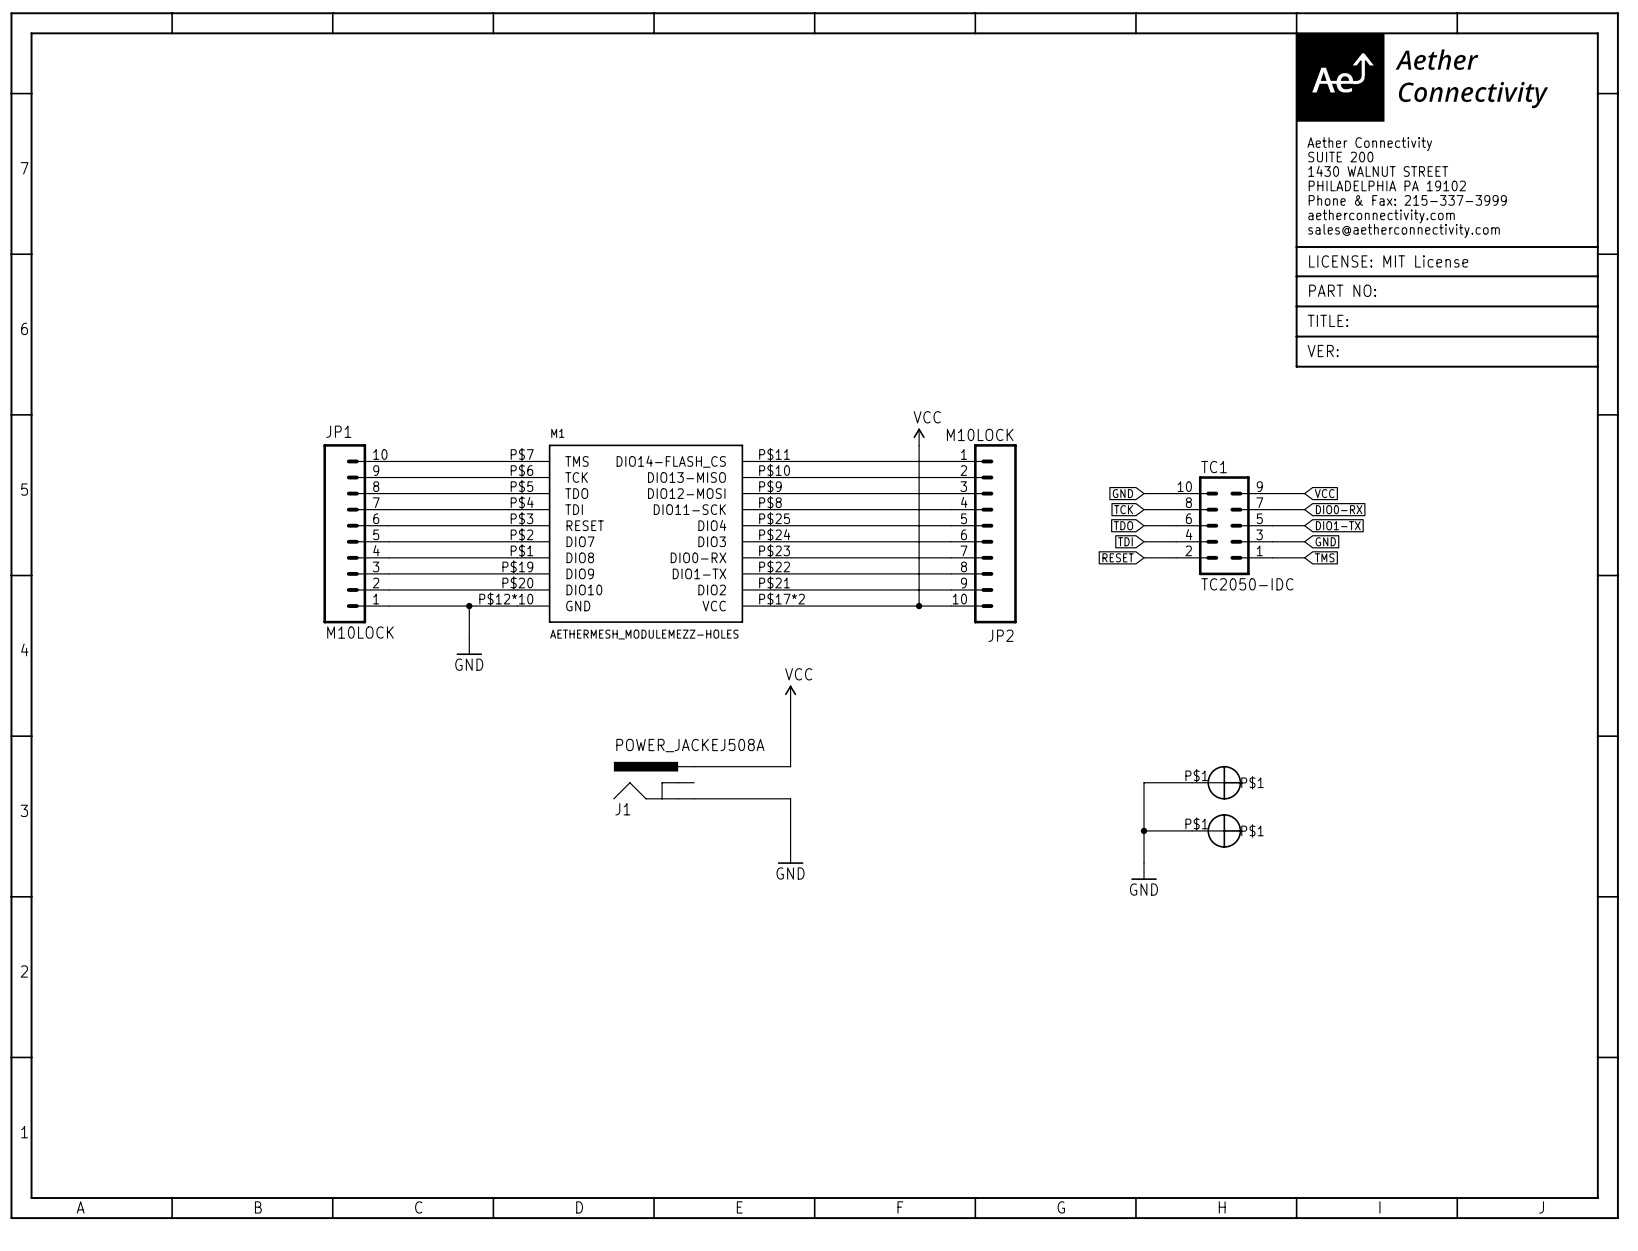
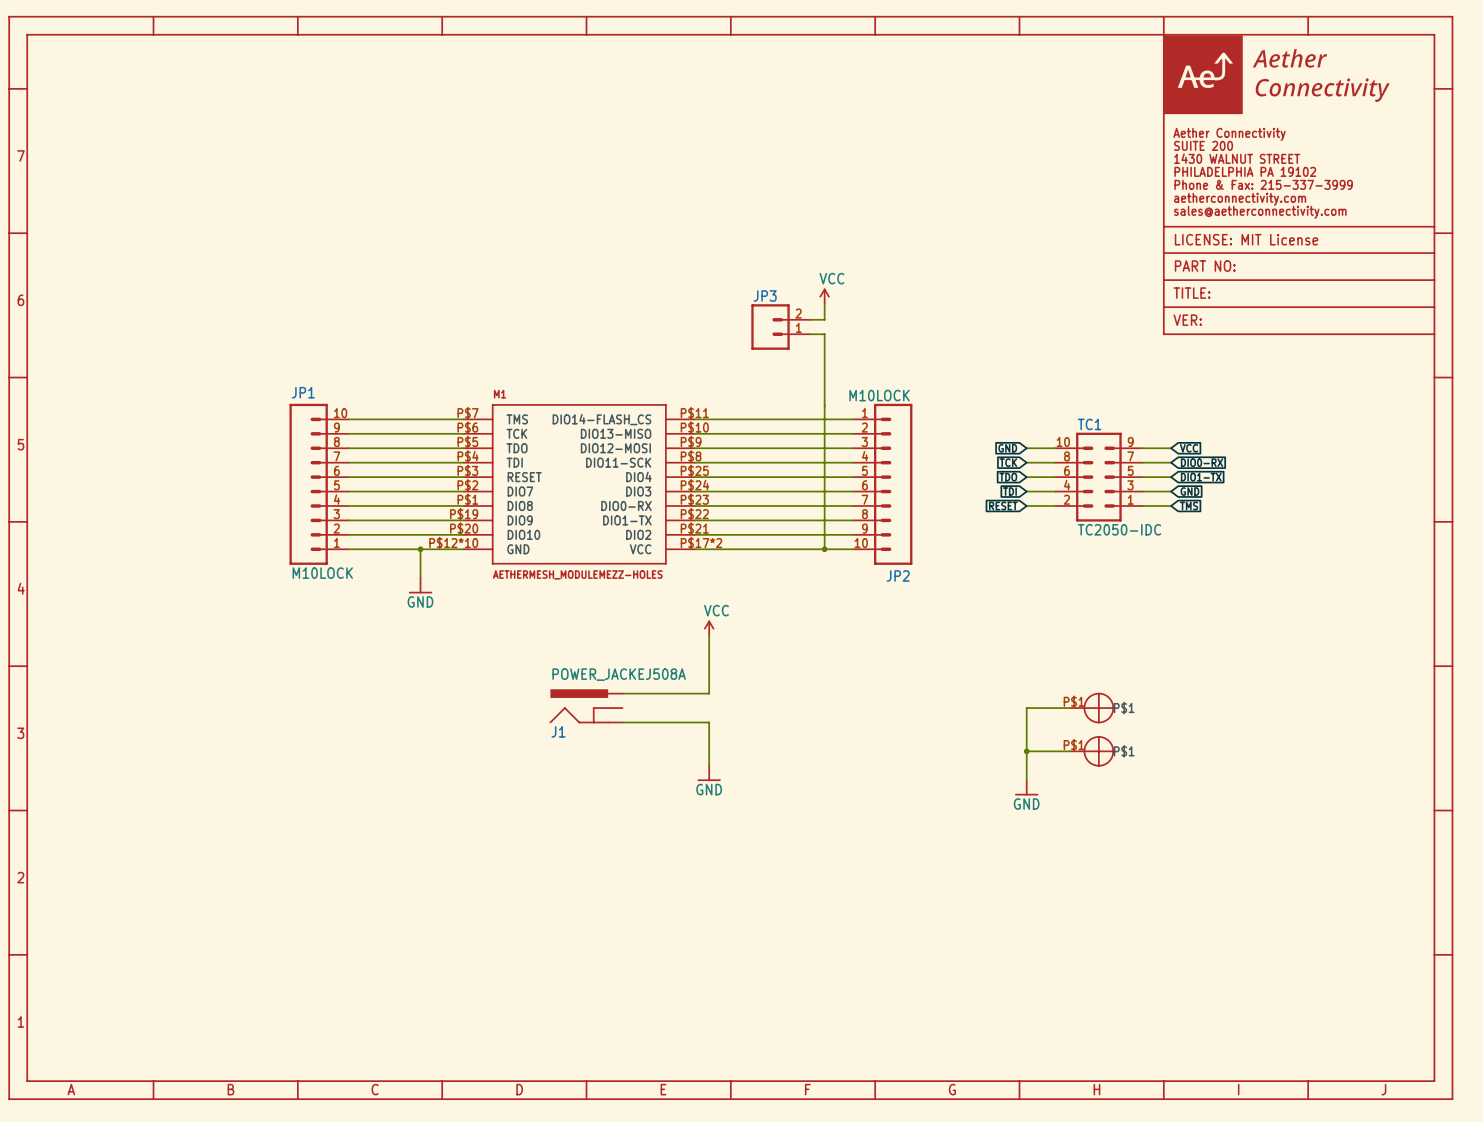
wire: none -> (824, 303) (824, 319) (810, 319)
JP3: none -> (780, 327)
wire: none -> (810, 334) (824, 334) (824, 404)
power symbol position: VCC (919, 436) -> VCC (824, 296)

